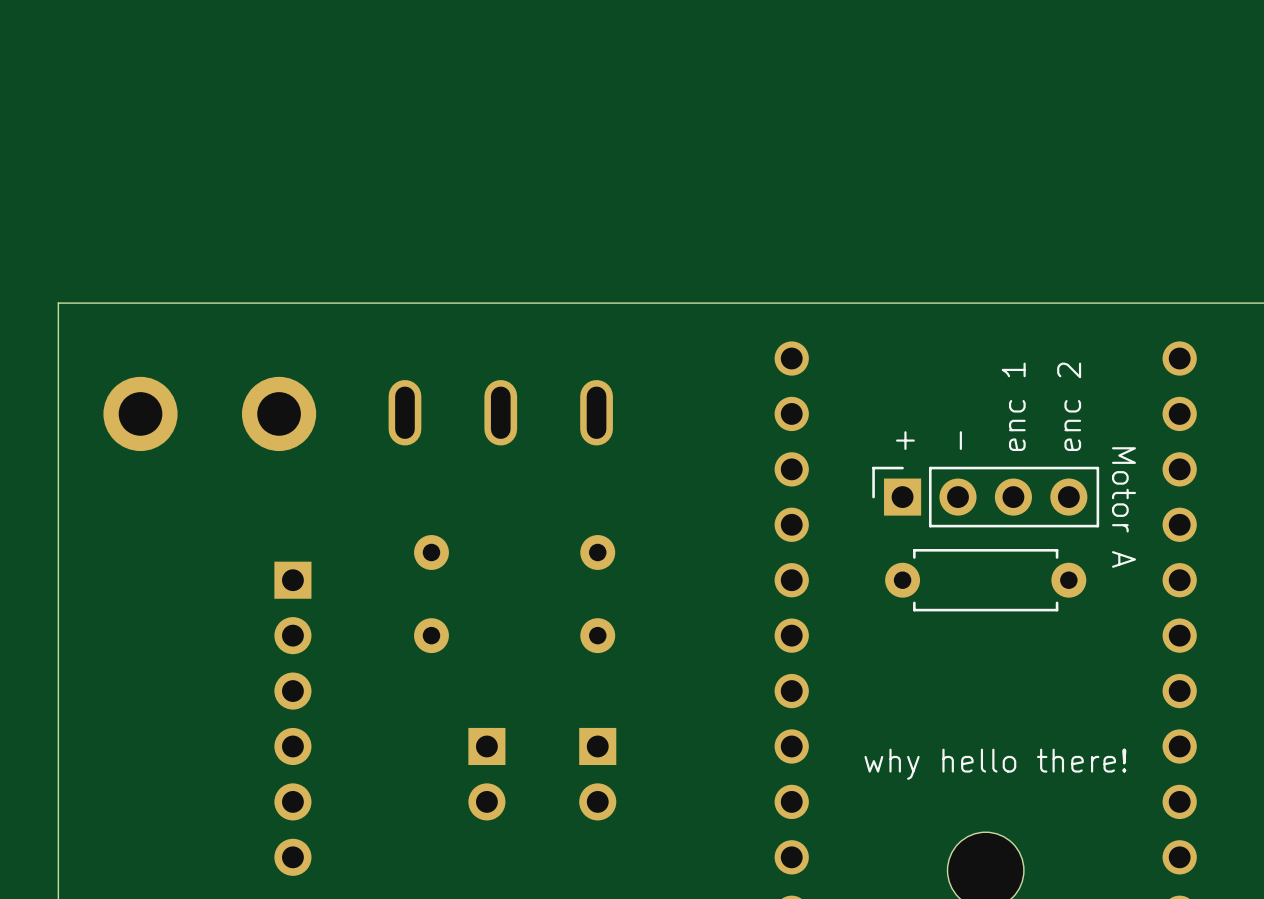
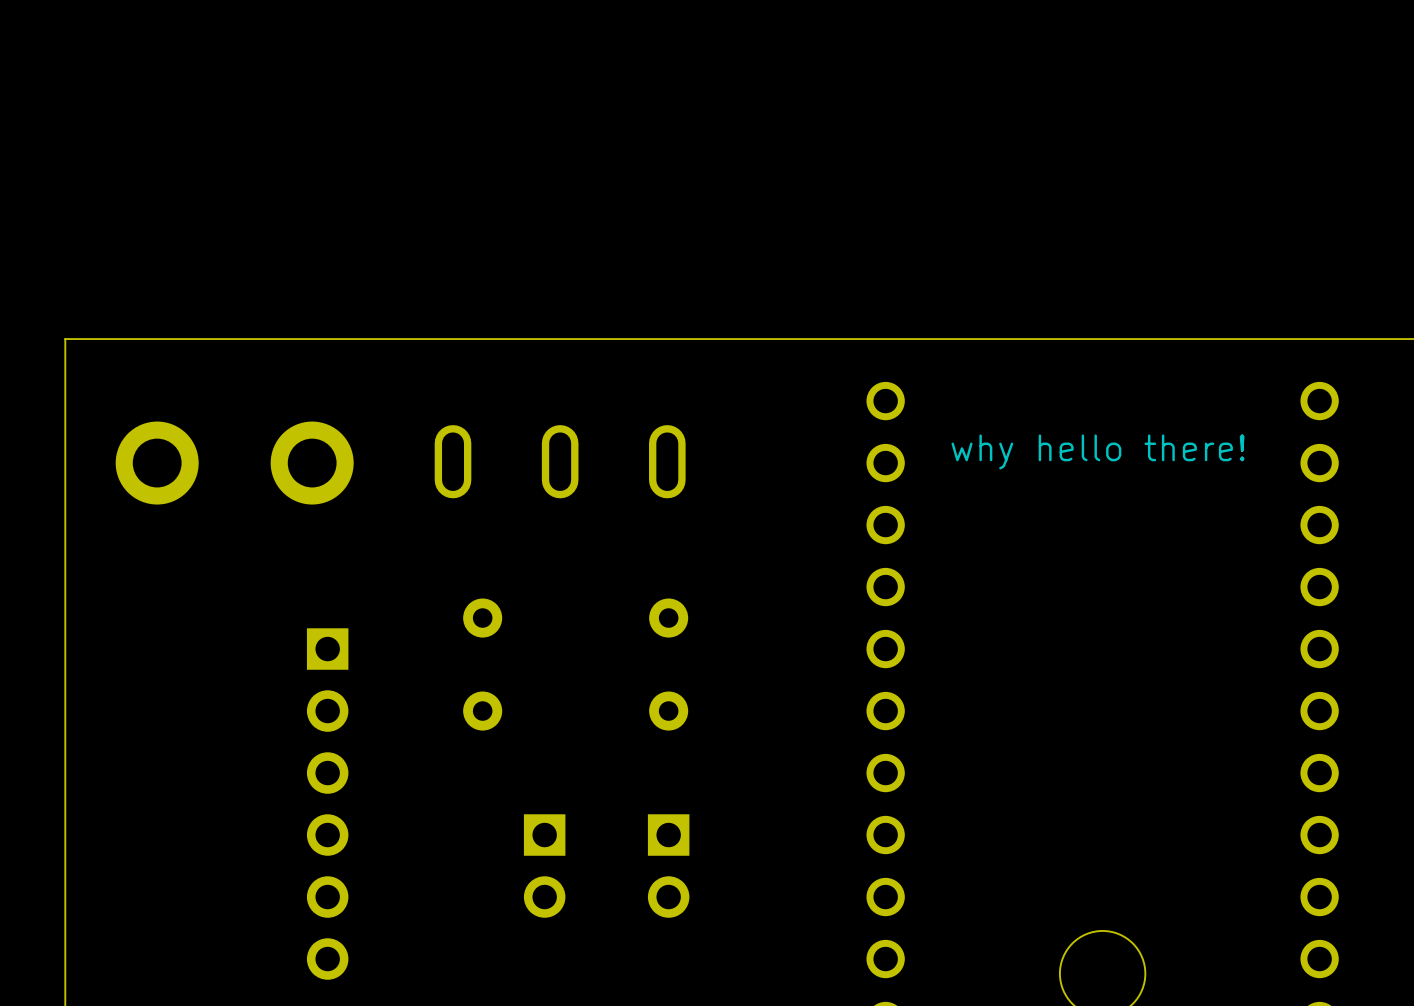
text: enc 1 (1013, 406) -> none
text: enc 2 (1069, 406) -> none
text: + (905, 440) -> none
text: - (960, 440) -> none
part: (985, 497) -> none
text: Motor A (1123, 507) -> none
part: (985, 580) -> none
text position: why hello there! (995, 764) -> why hello there! (1098, 451)

